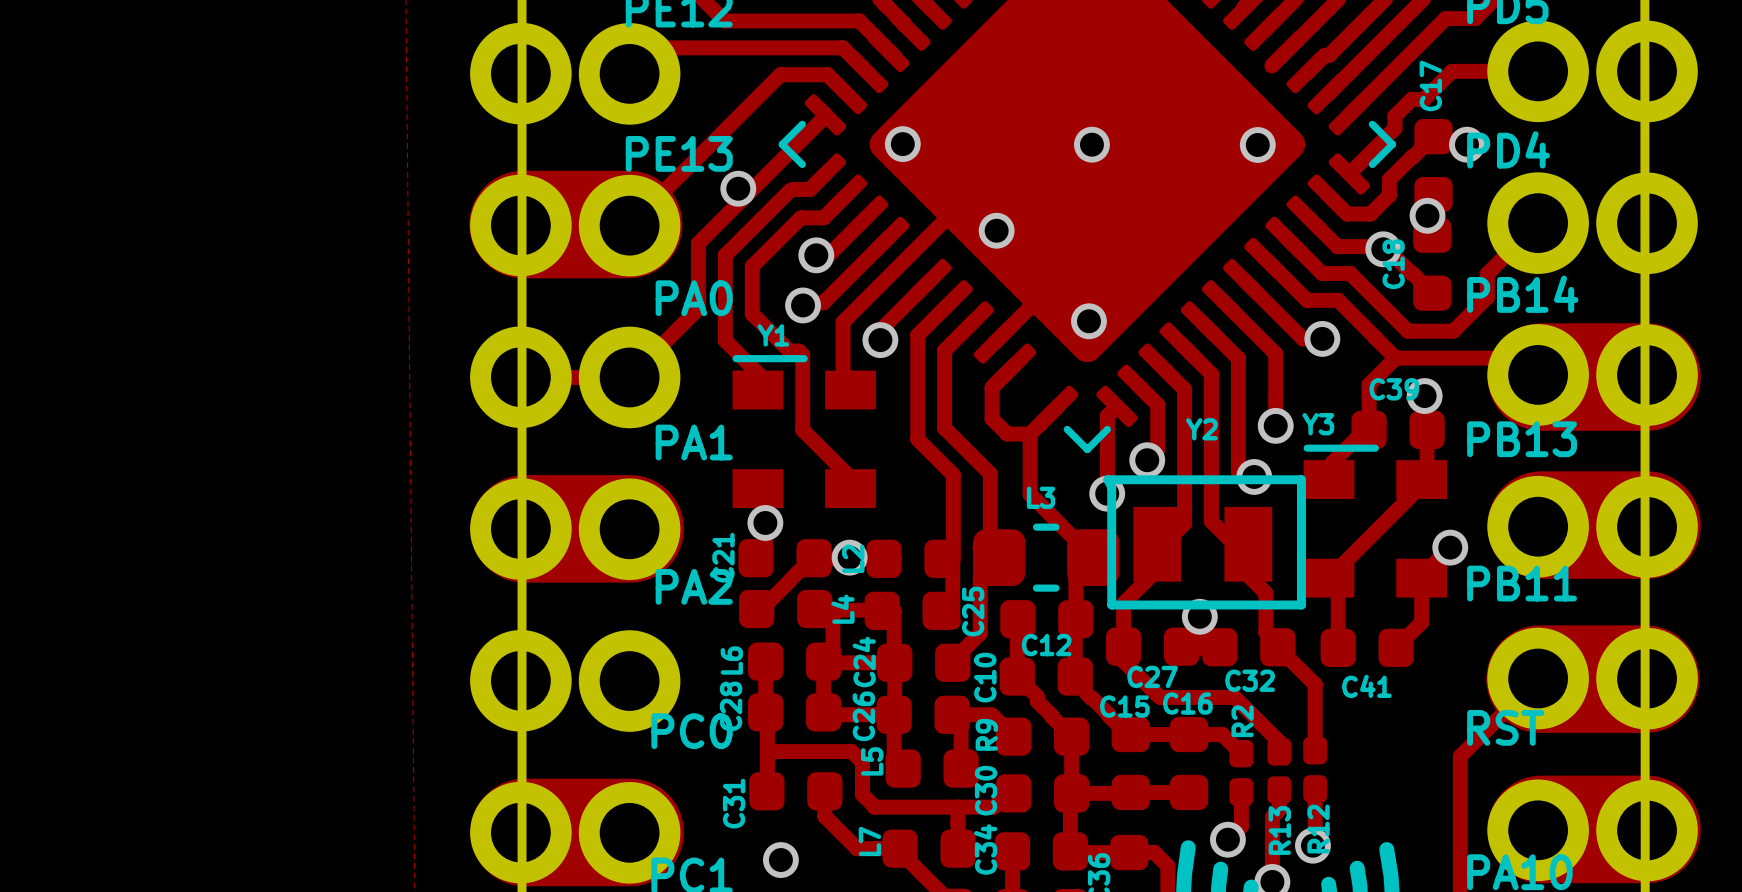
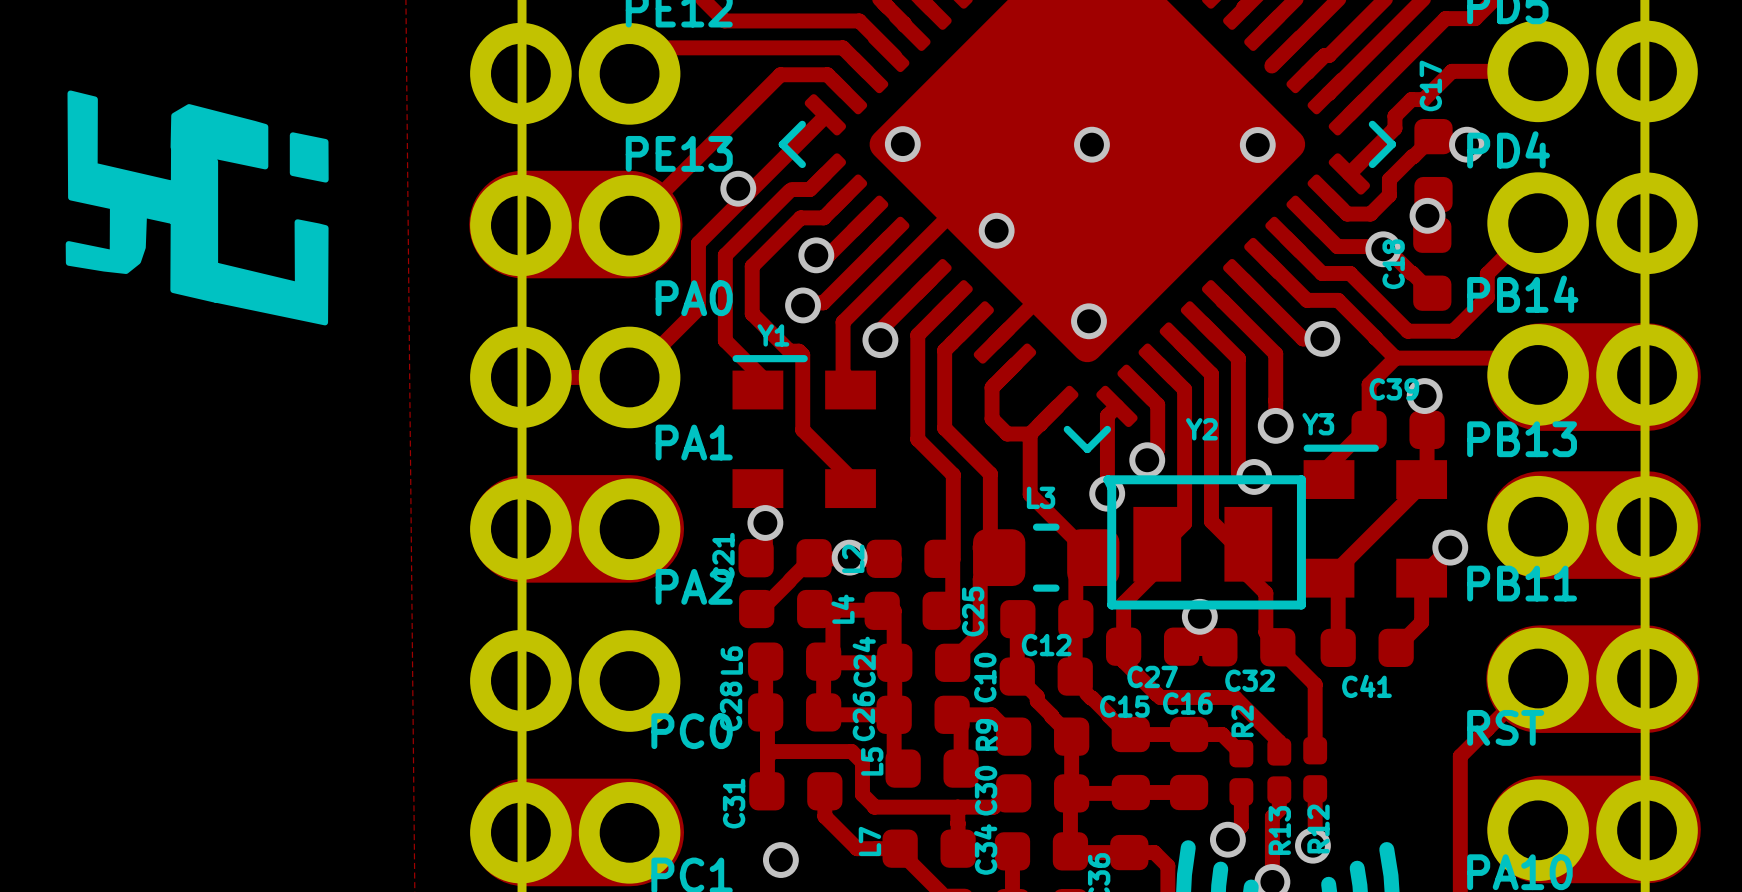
drawing: none -> [65, 90, 329, 326]

